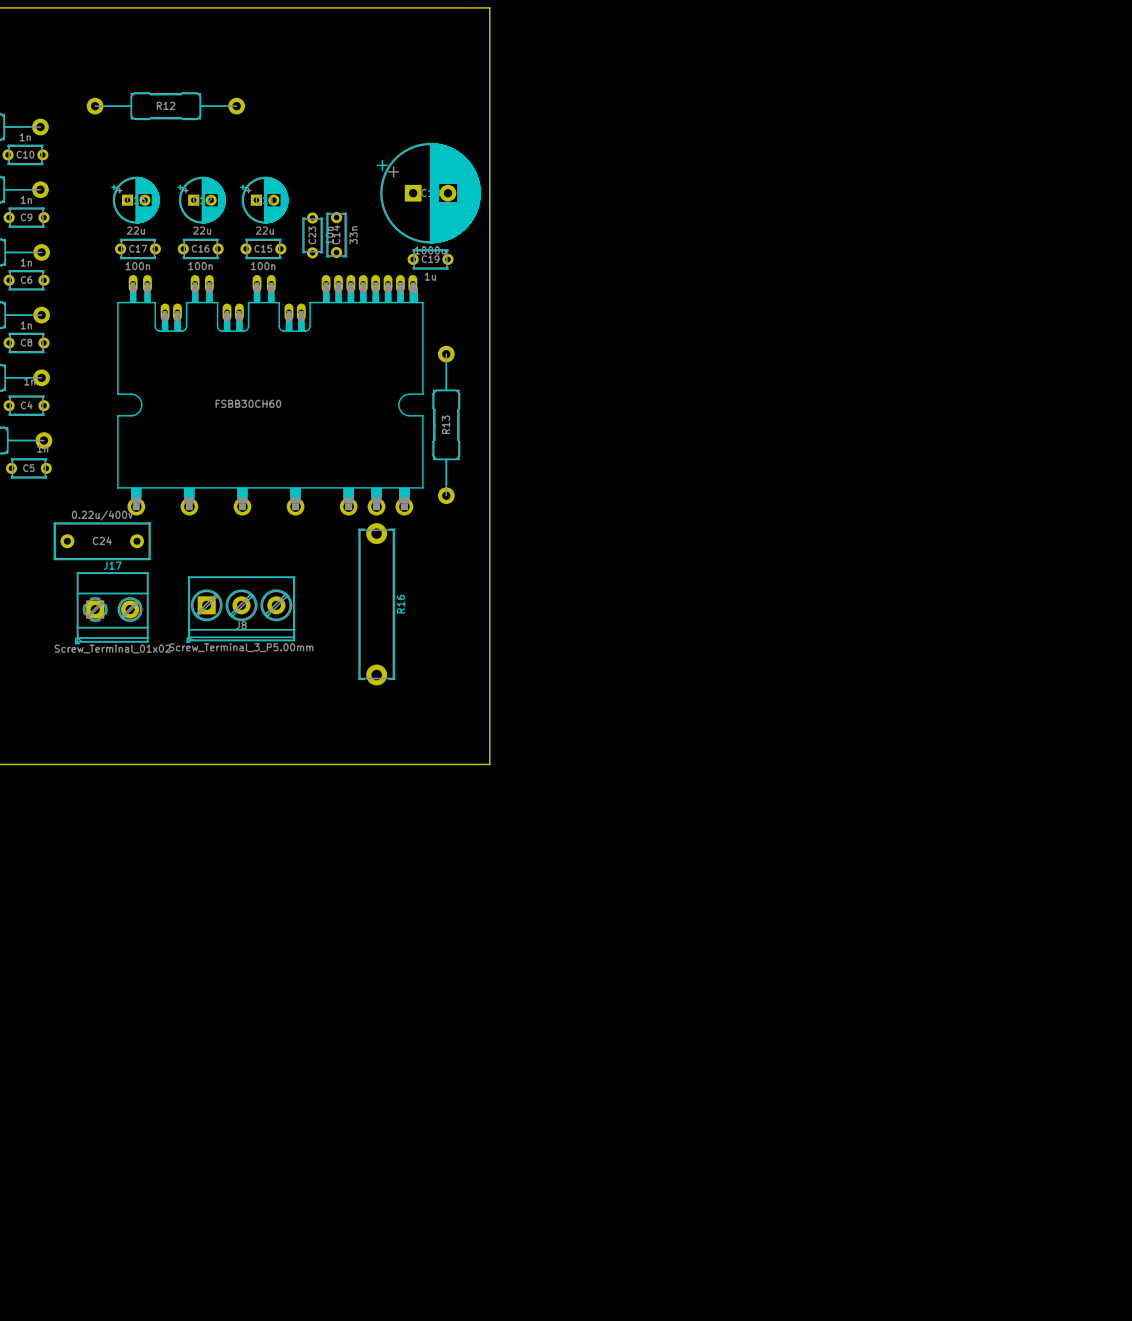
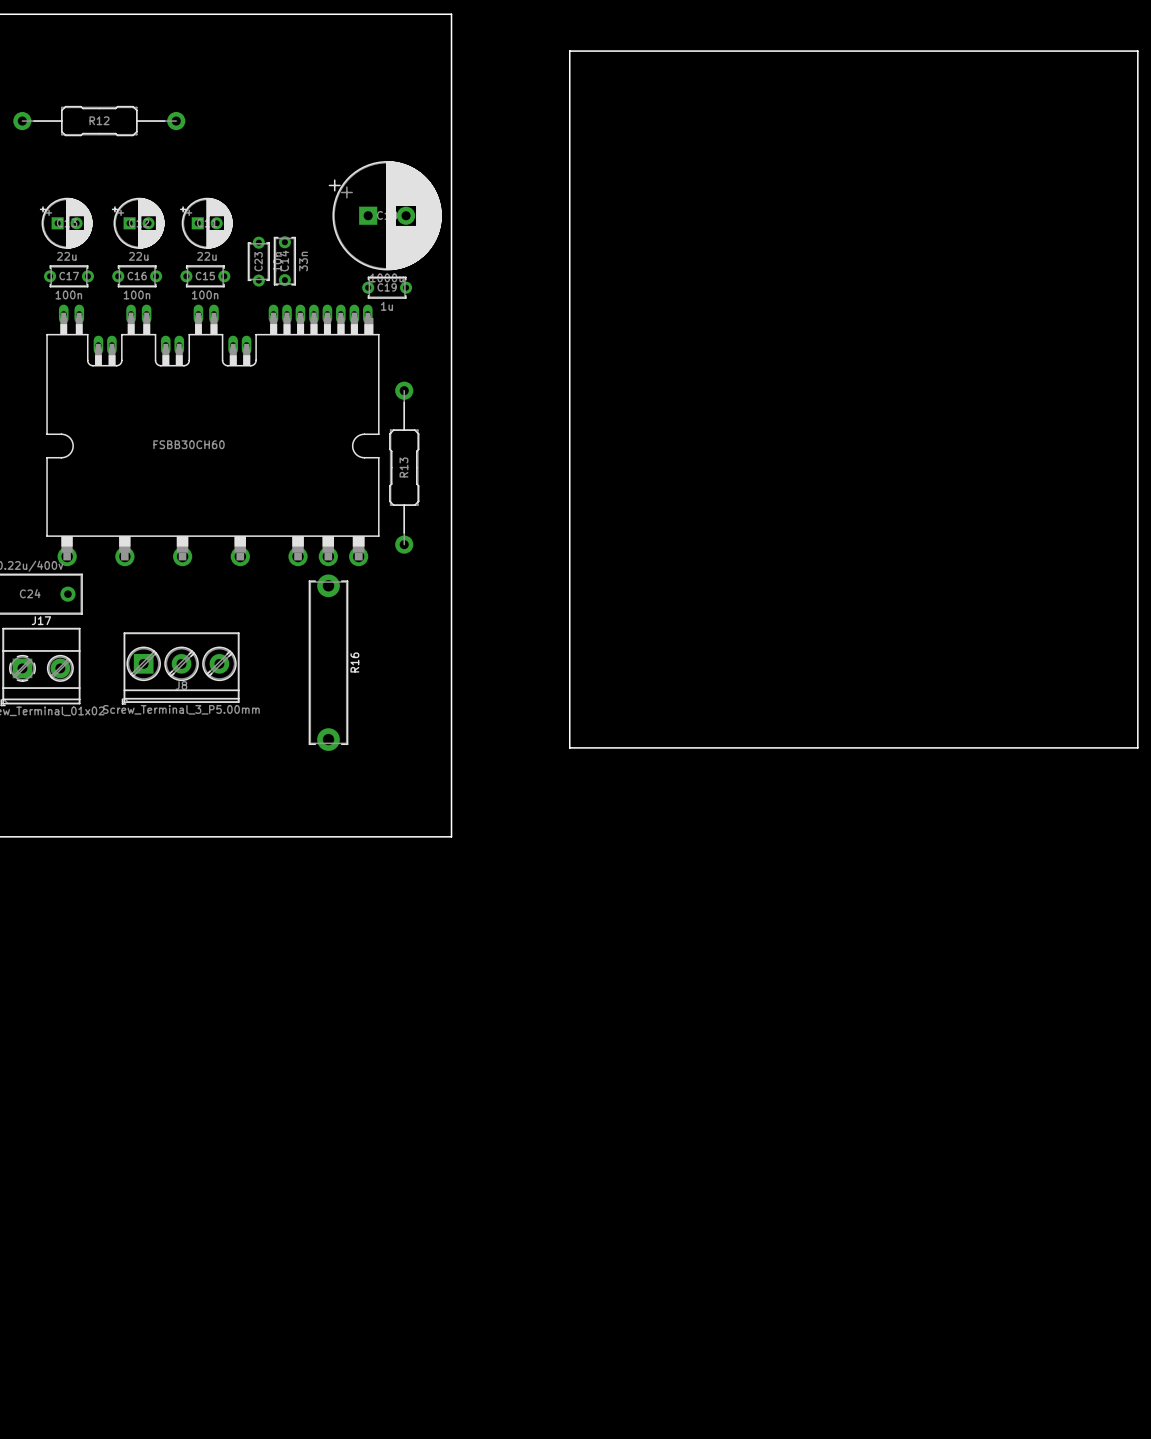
board edge: none -> (569, 51) (1137, 51) (1137, 747) (569, 747) (569, 51)

